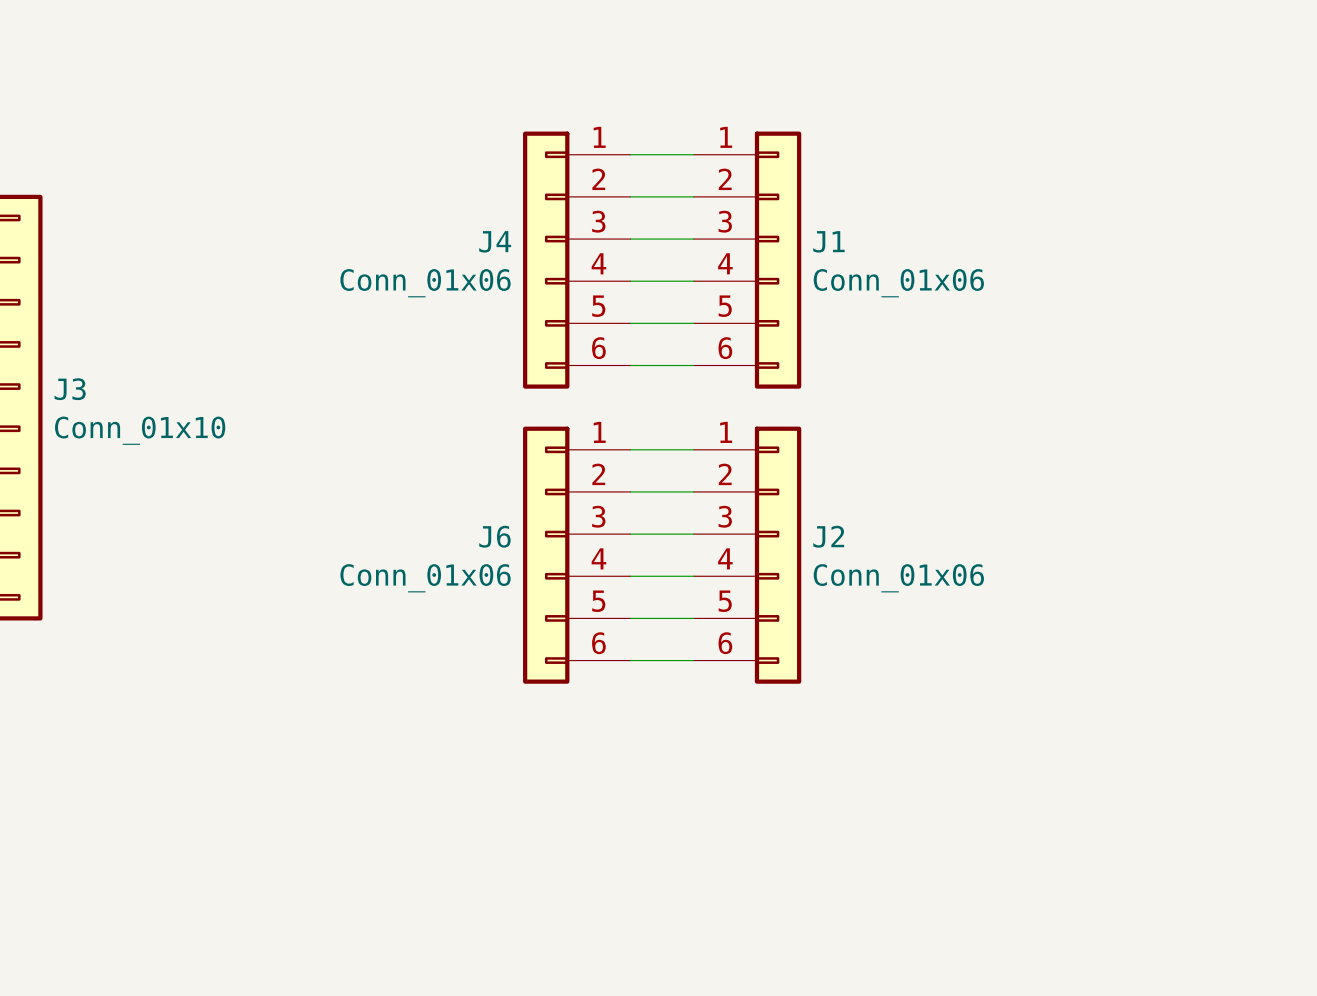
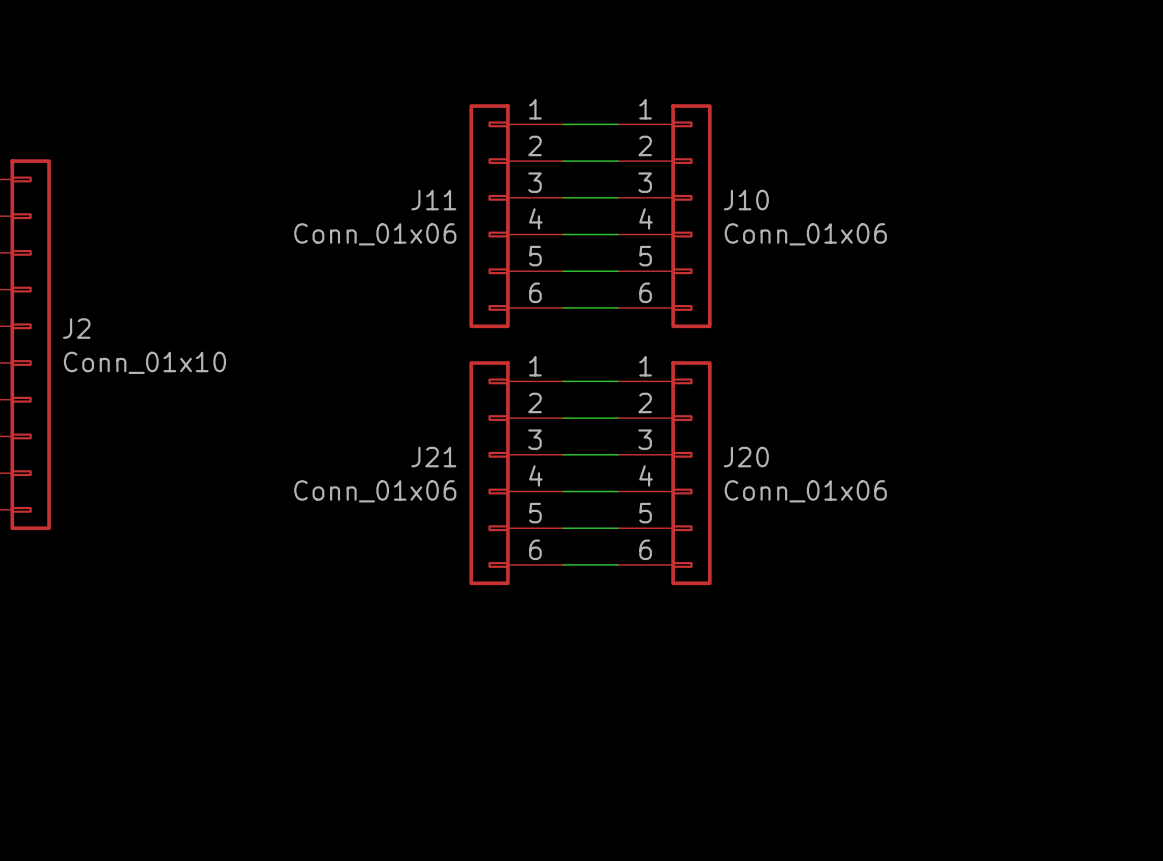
J4 name: J4 (495, 241) -> J11 (433, 200)
J1 name: J1 (828, 241) -> J10 (746, 200)
J3 name: J3 (70, 389) -> J2 (76, 328)
J6 name: J6 (494, 536) -> J21 (433, 457)
J2 name: J2 (828, 536) -> J20 (746, 457)

